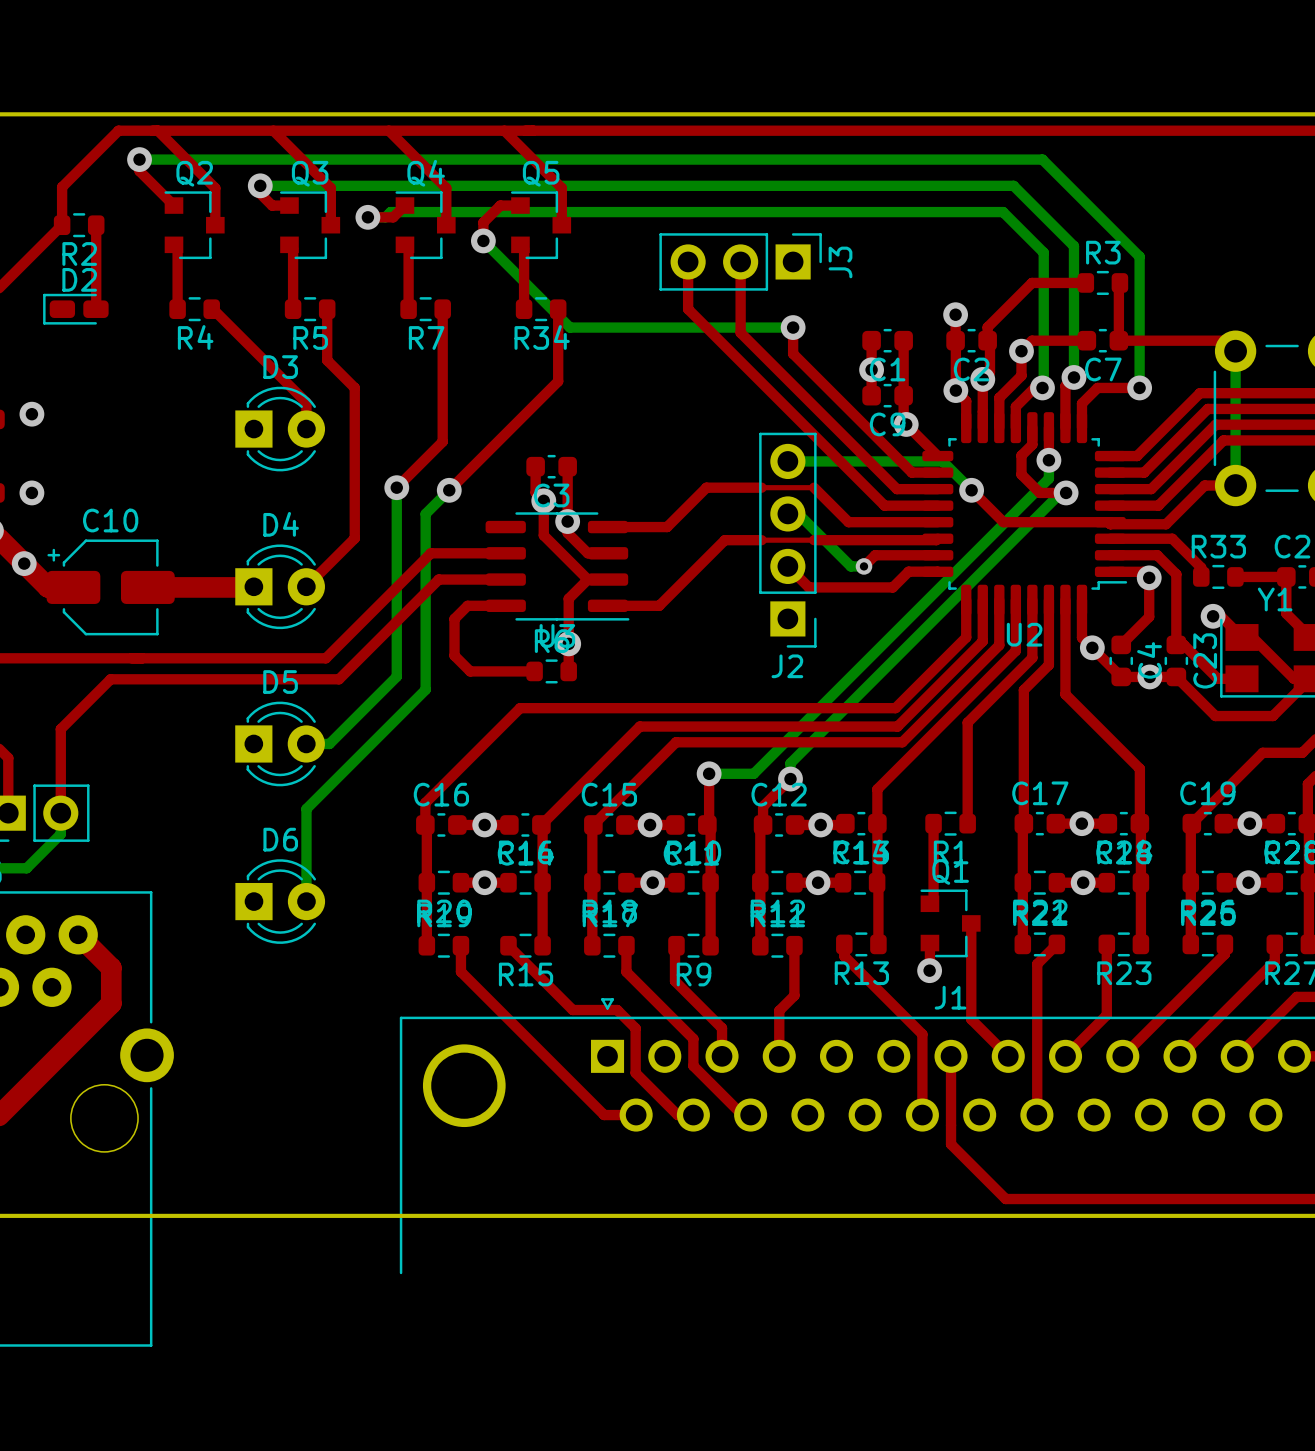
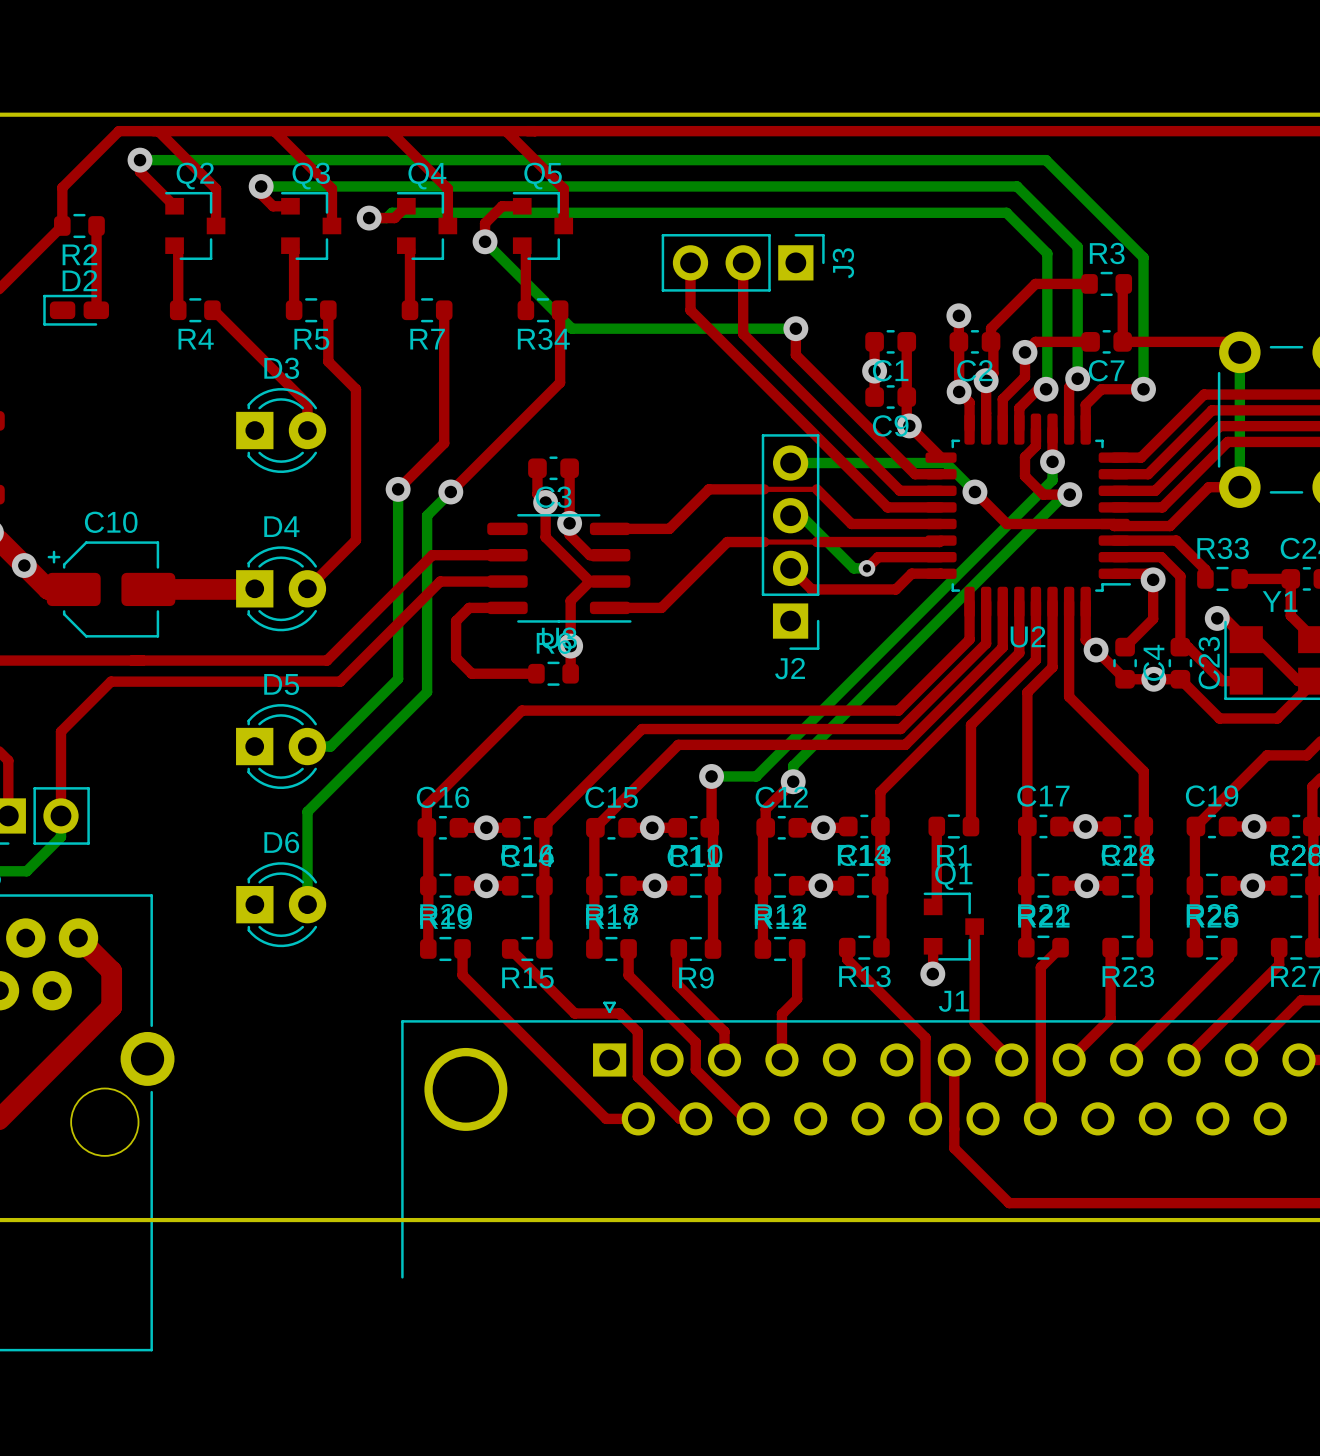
via: (31, 414) -> none
via: (31, 492) -> none

